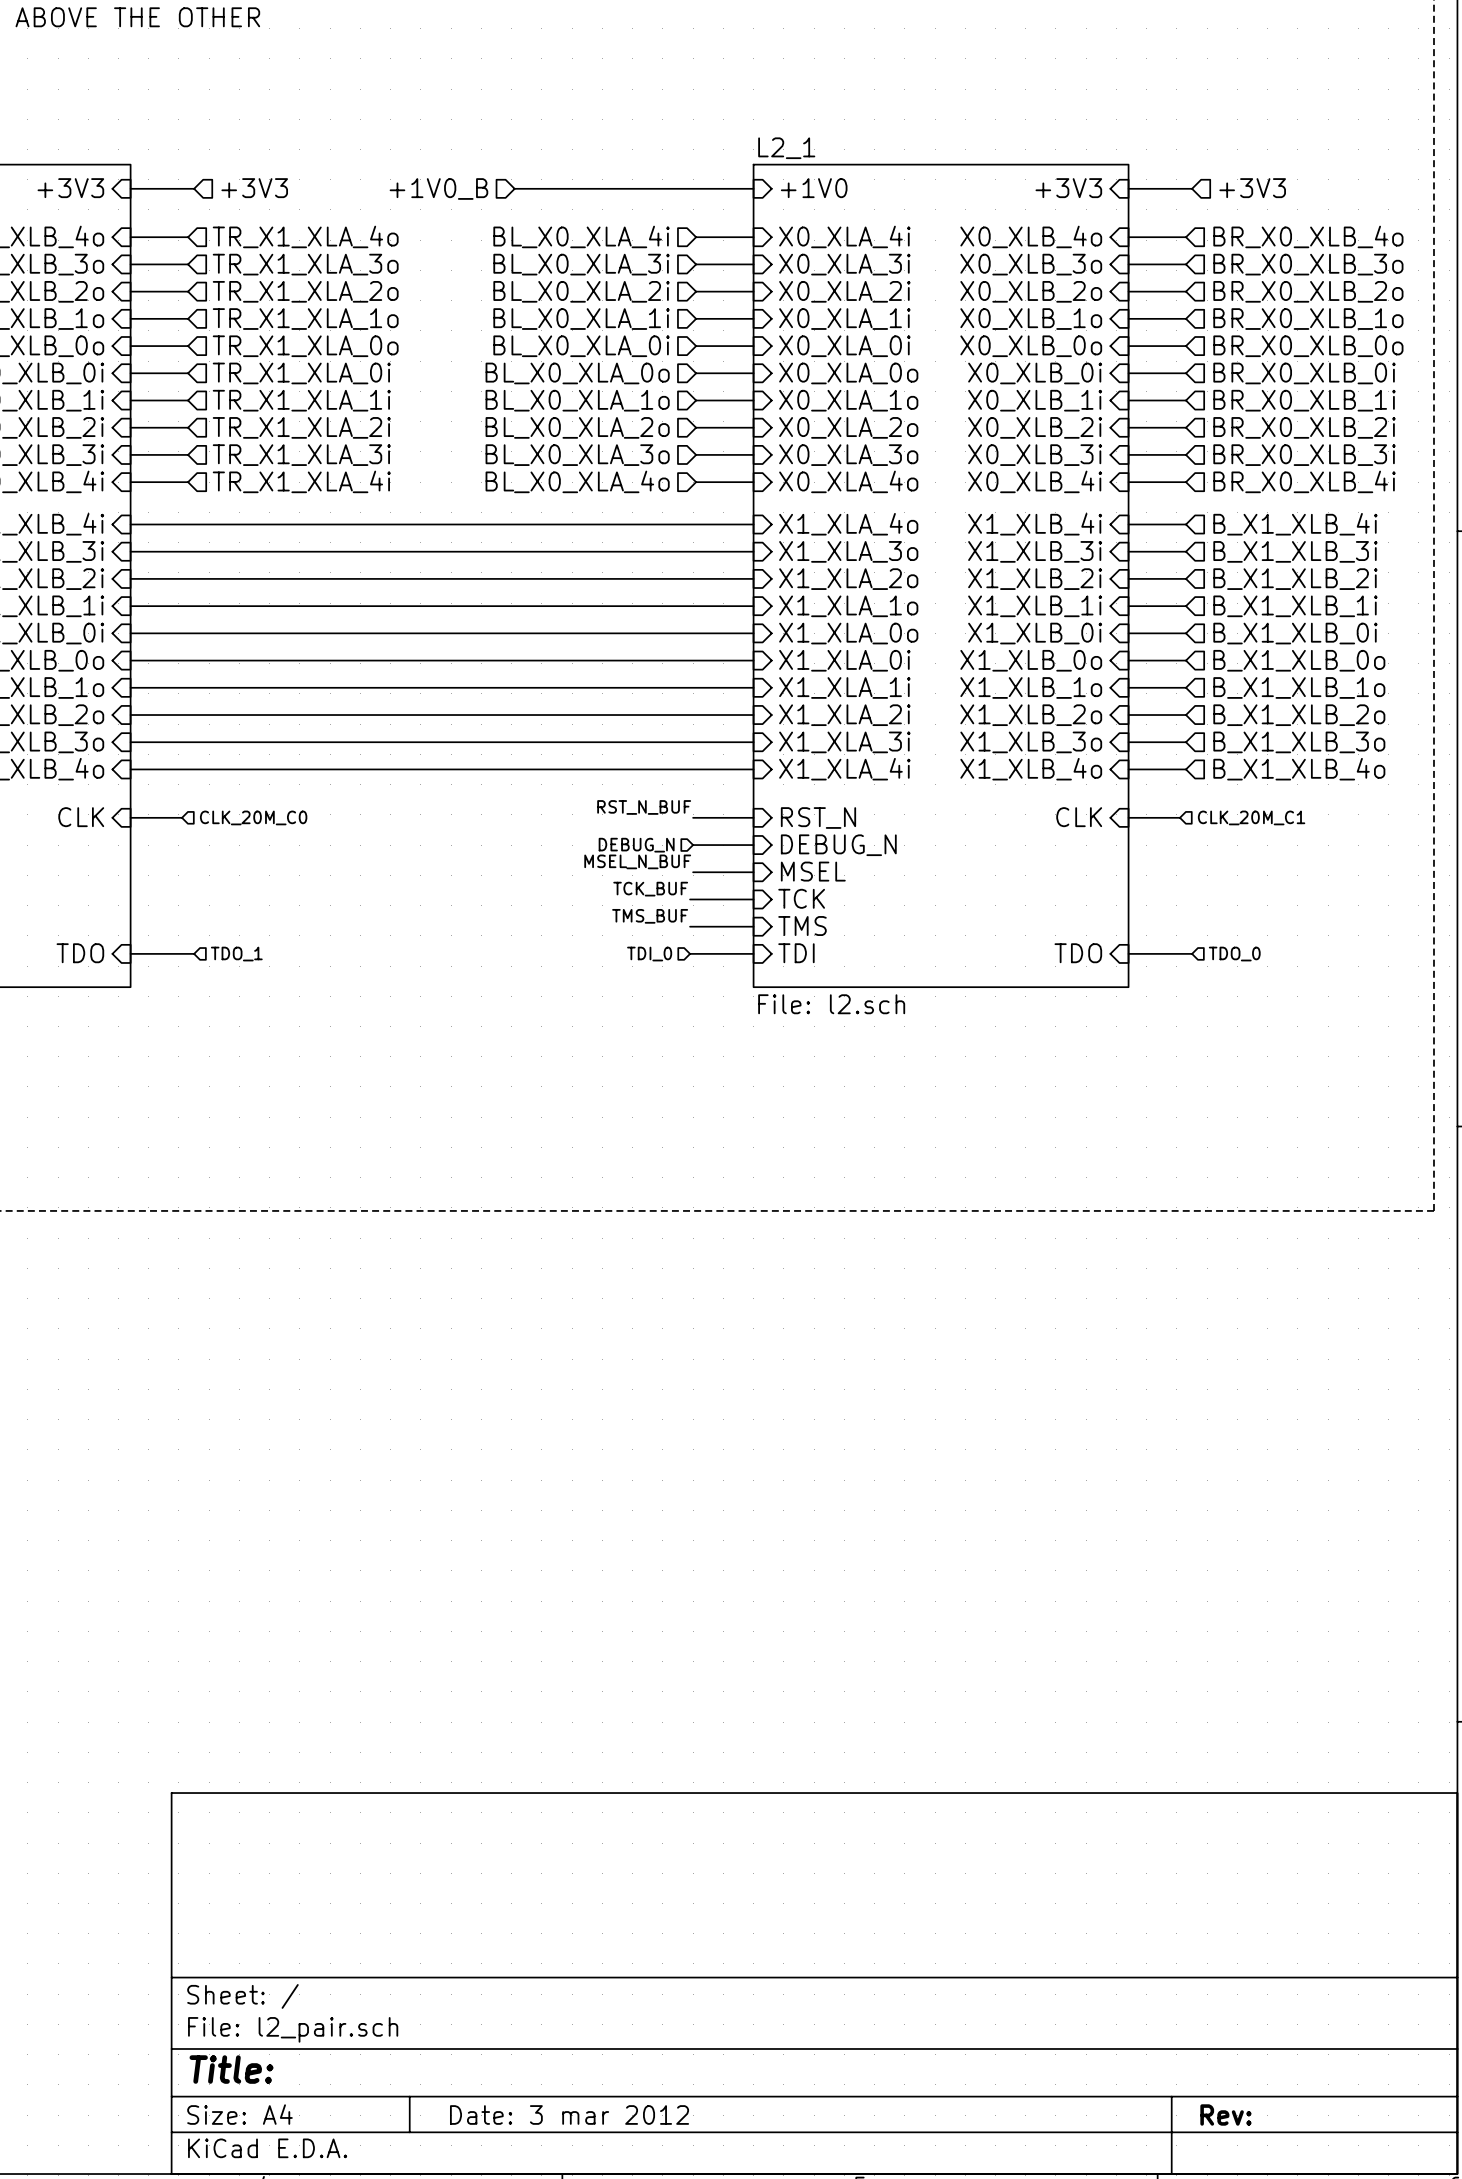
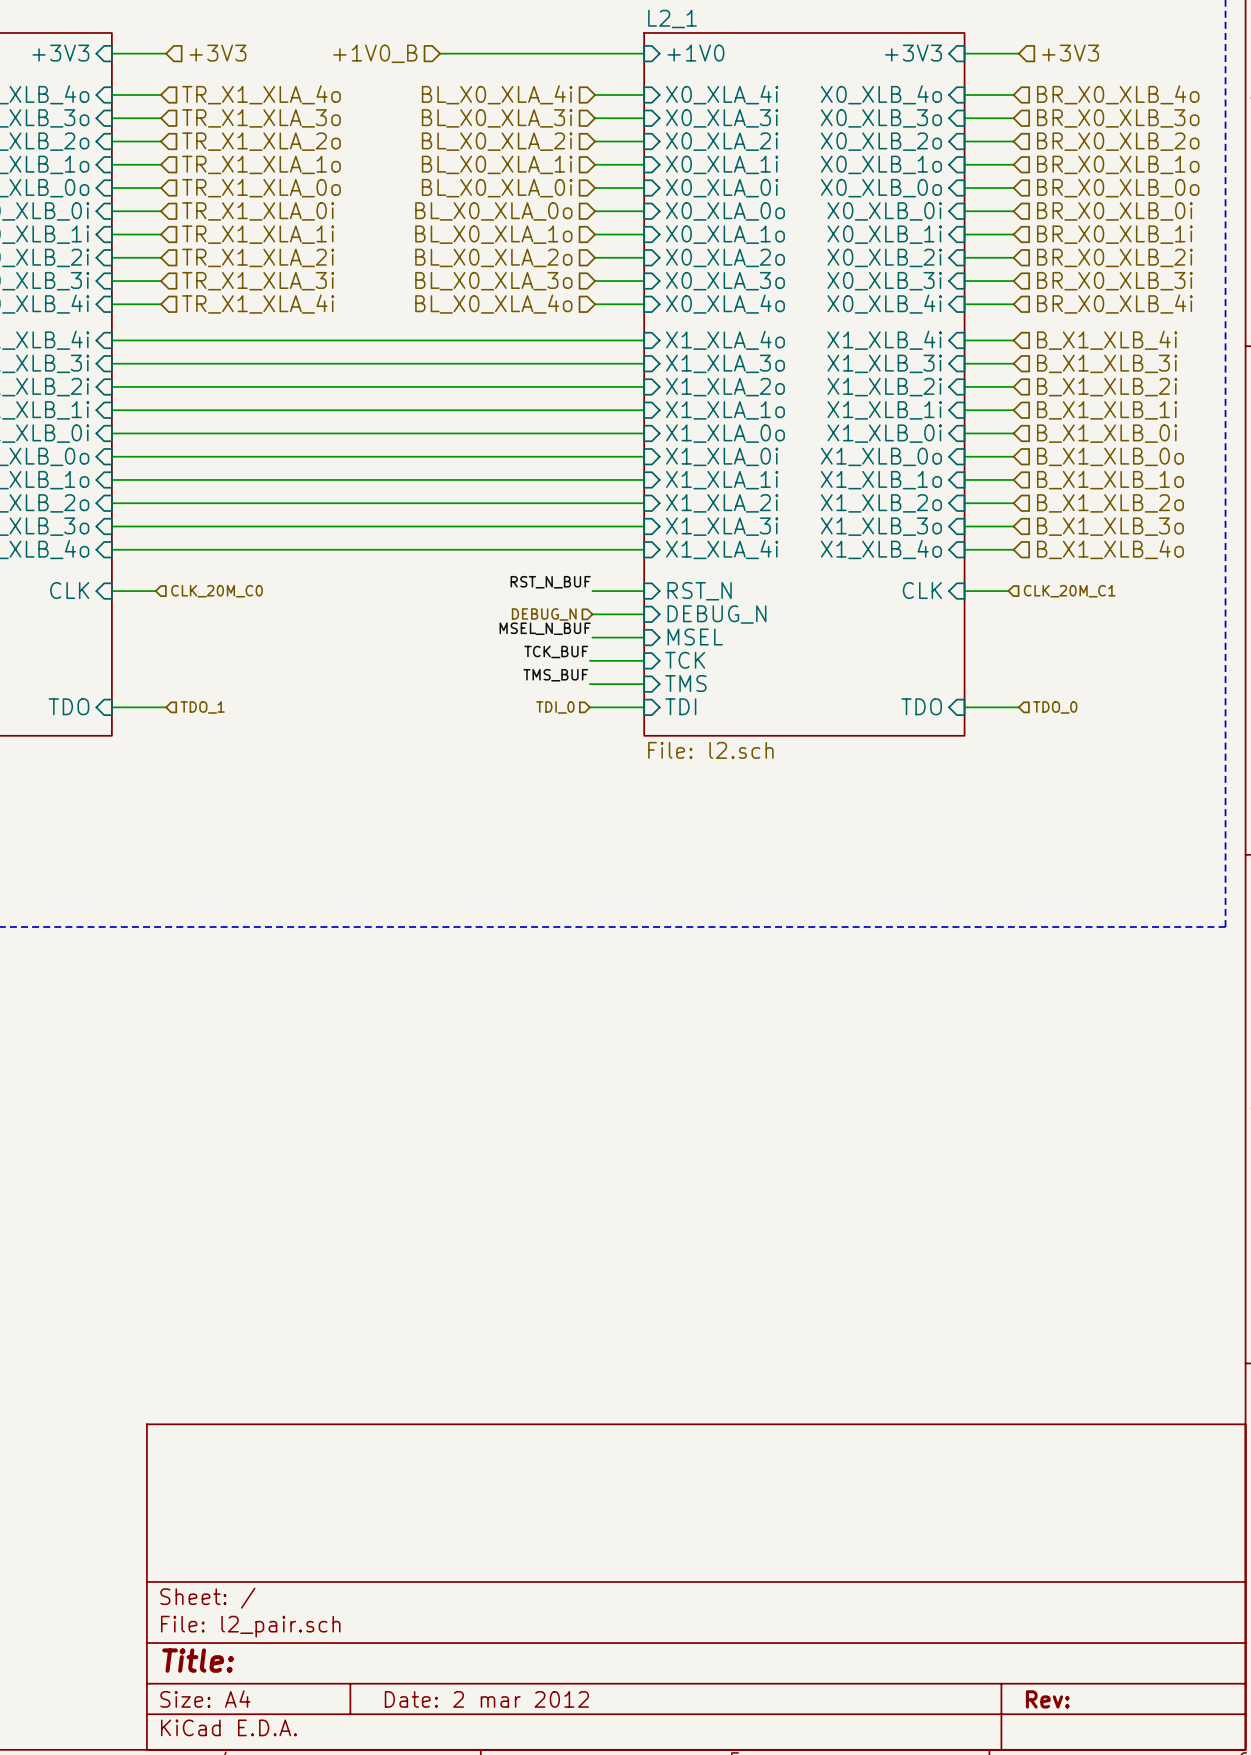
title block: Date: 3 mar 2012 (569, 2115) -> Date: 2 mar 2012 (486, 1699)

